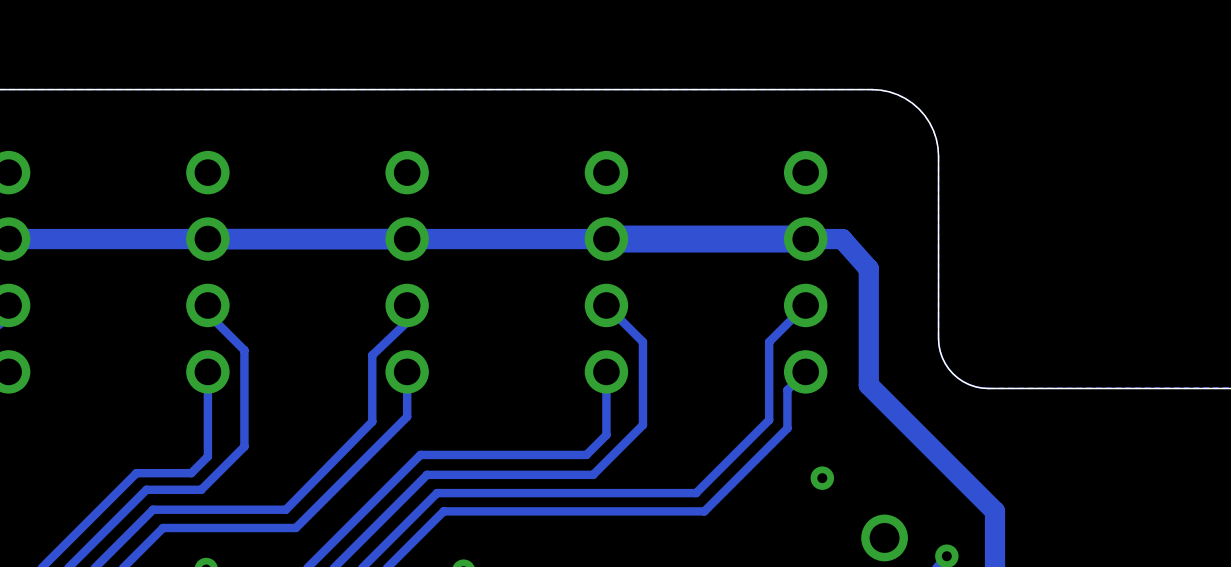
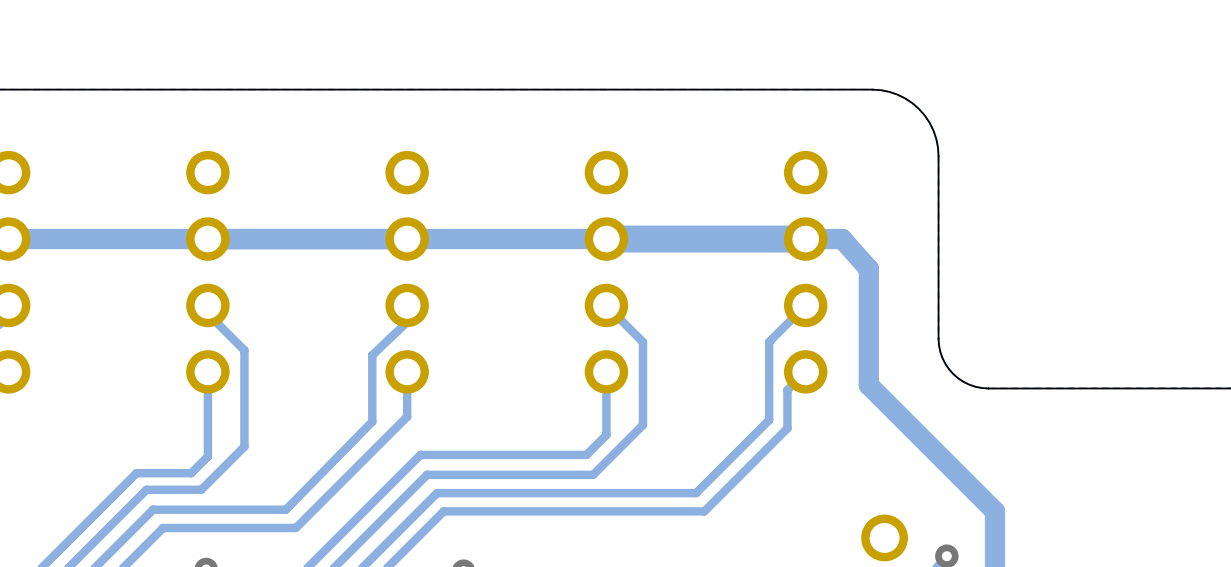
via: (822, 478) -> none

